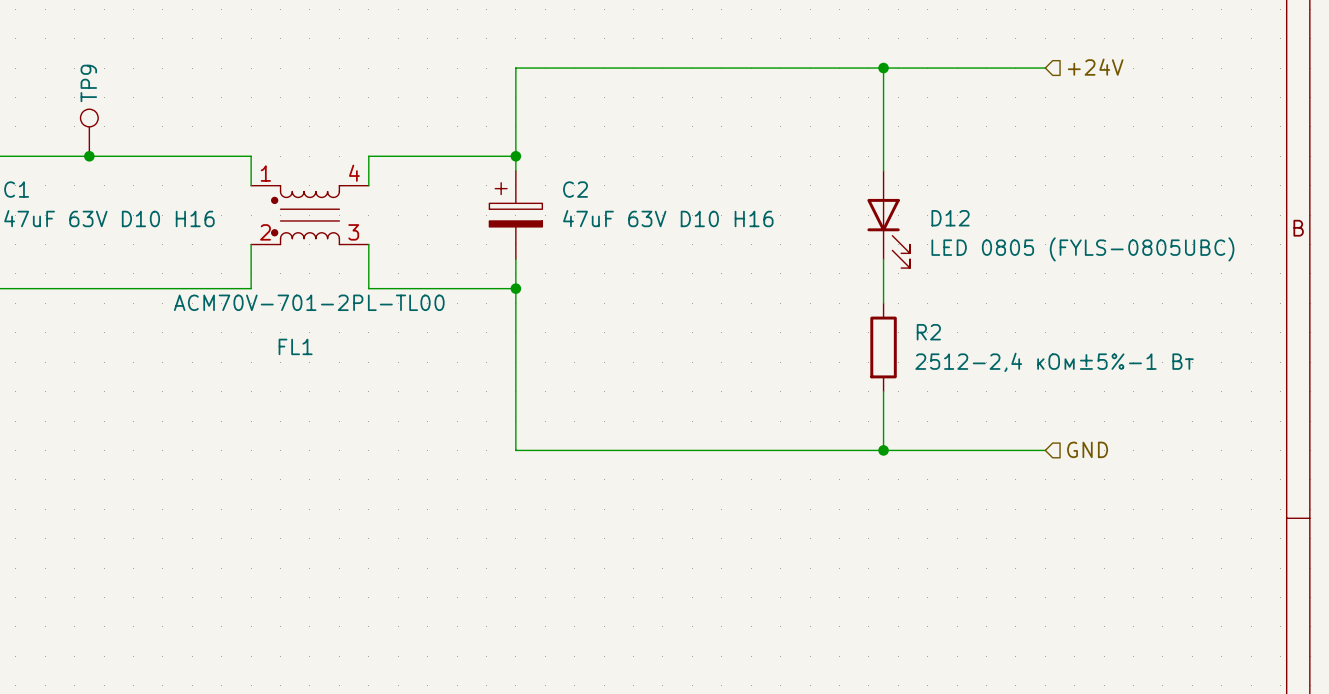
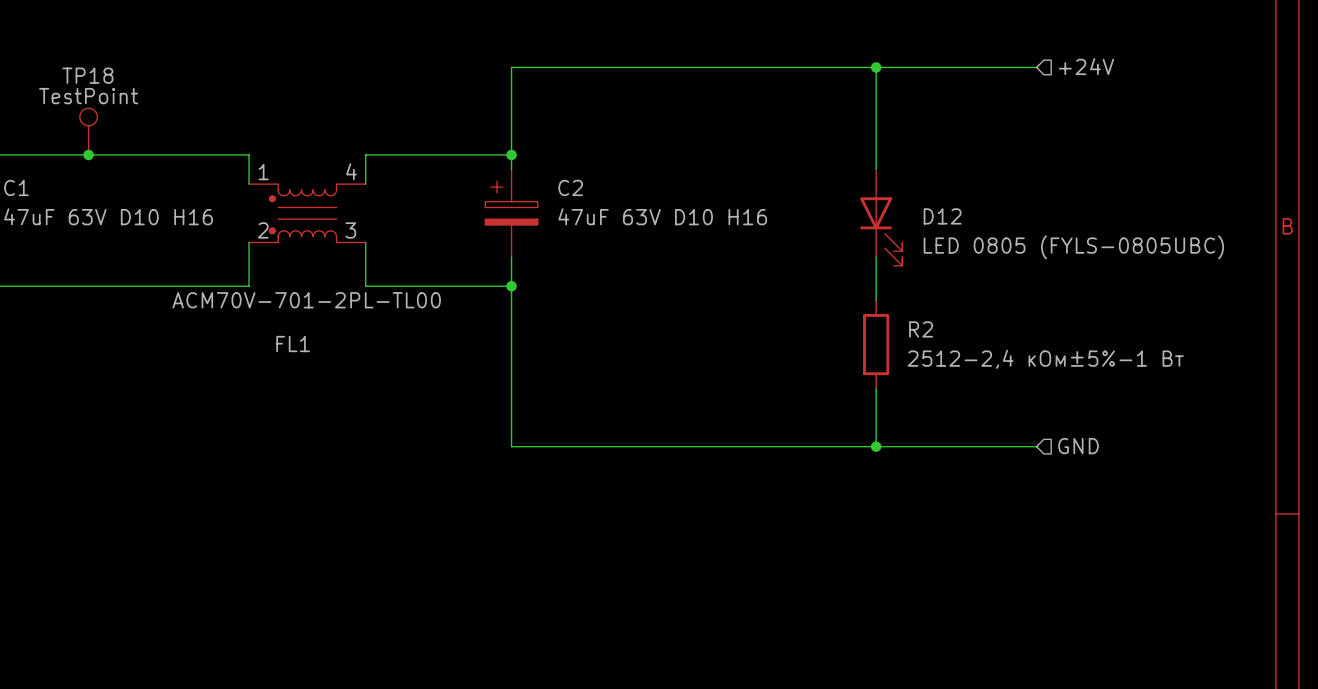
TP9 name: TP9 (88, 83) -> TP18 (87, 75)
TP9 value: none -> TestPoint (88, 96)

